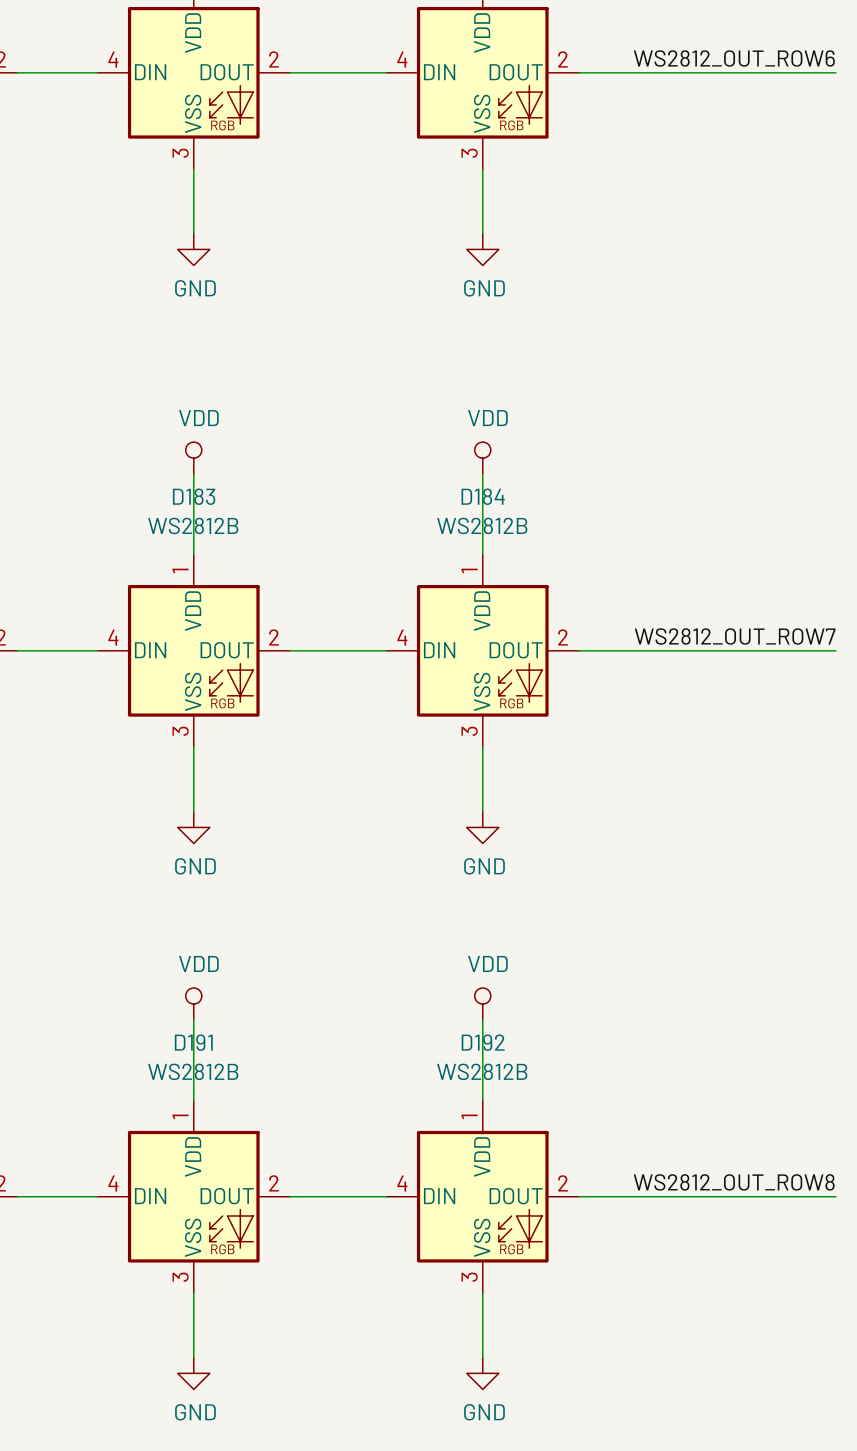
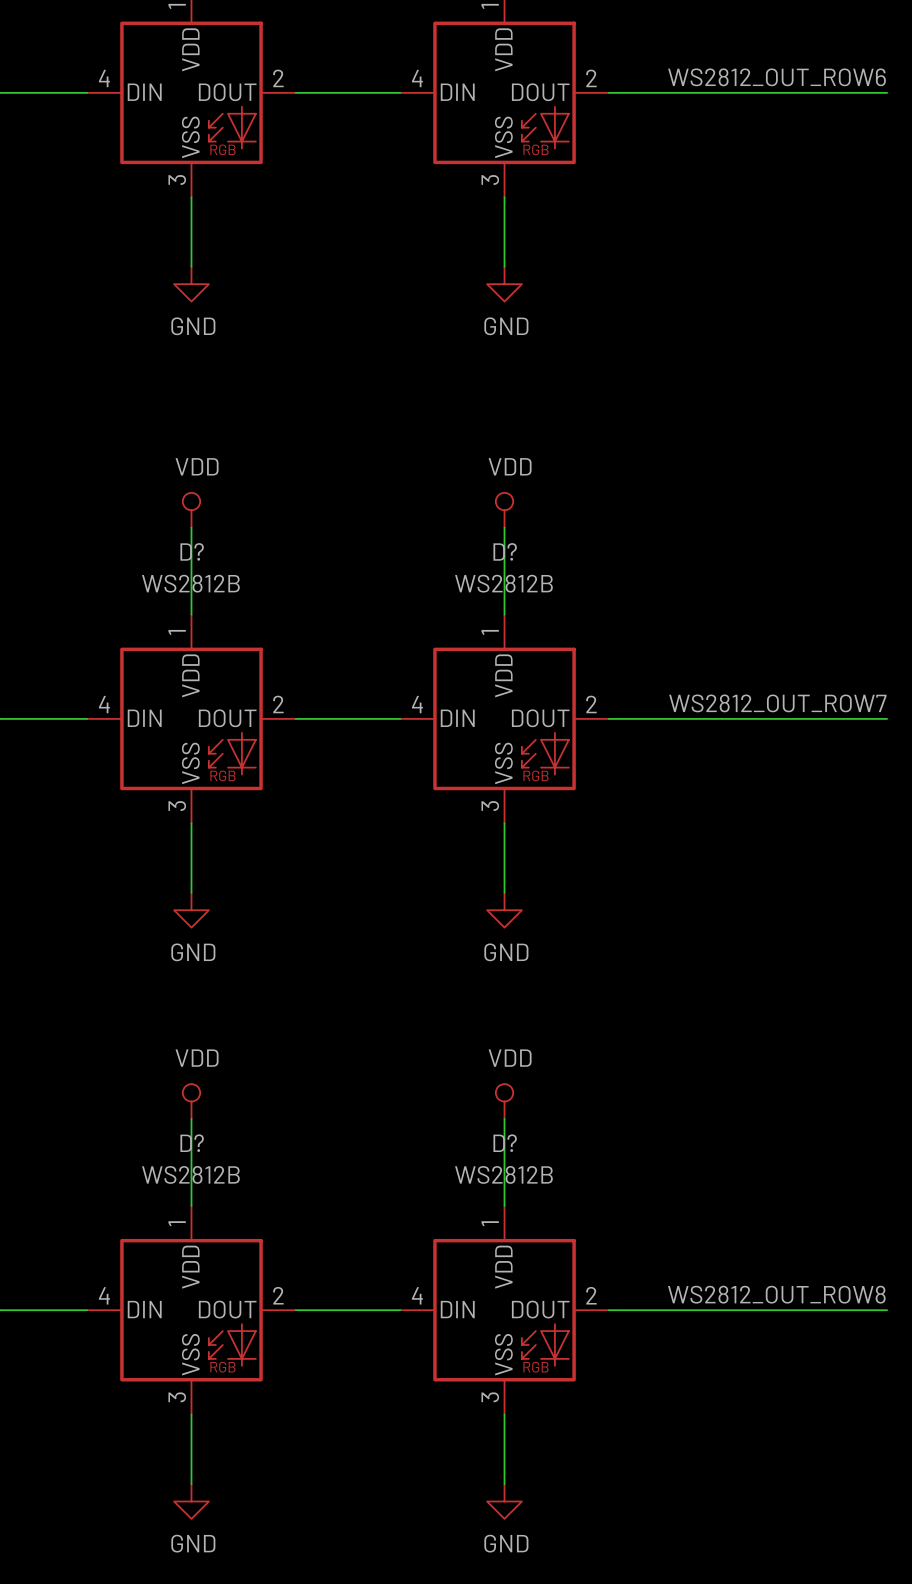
D183 name: D183 (194, 496) -> D? (192, 551)
D184 name: D184 (483, 496) -> D? (505, 551)
D191 name: D191 (193, 1042) -> D? (192, 1143)
D192 name: D192 (483, 1042) -> D? (505, 1143)

